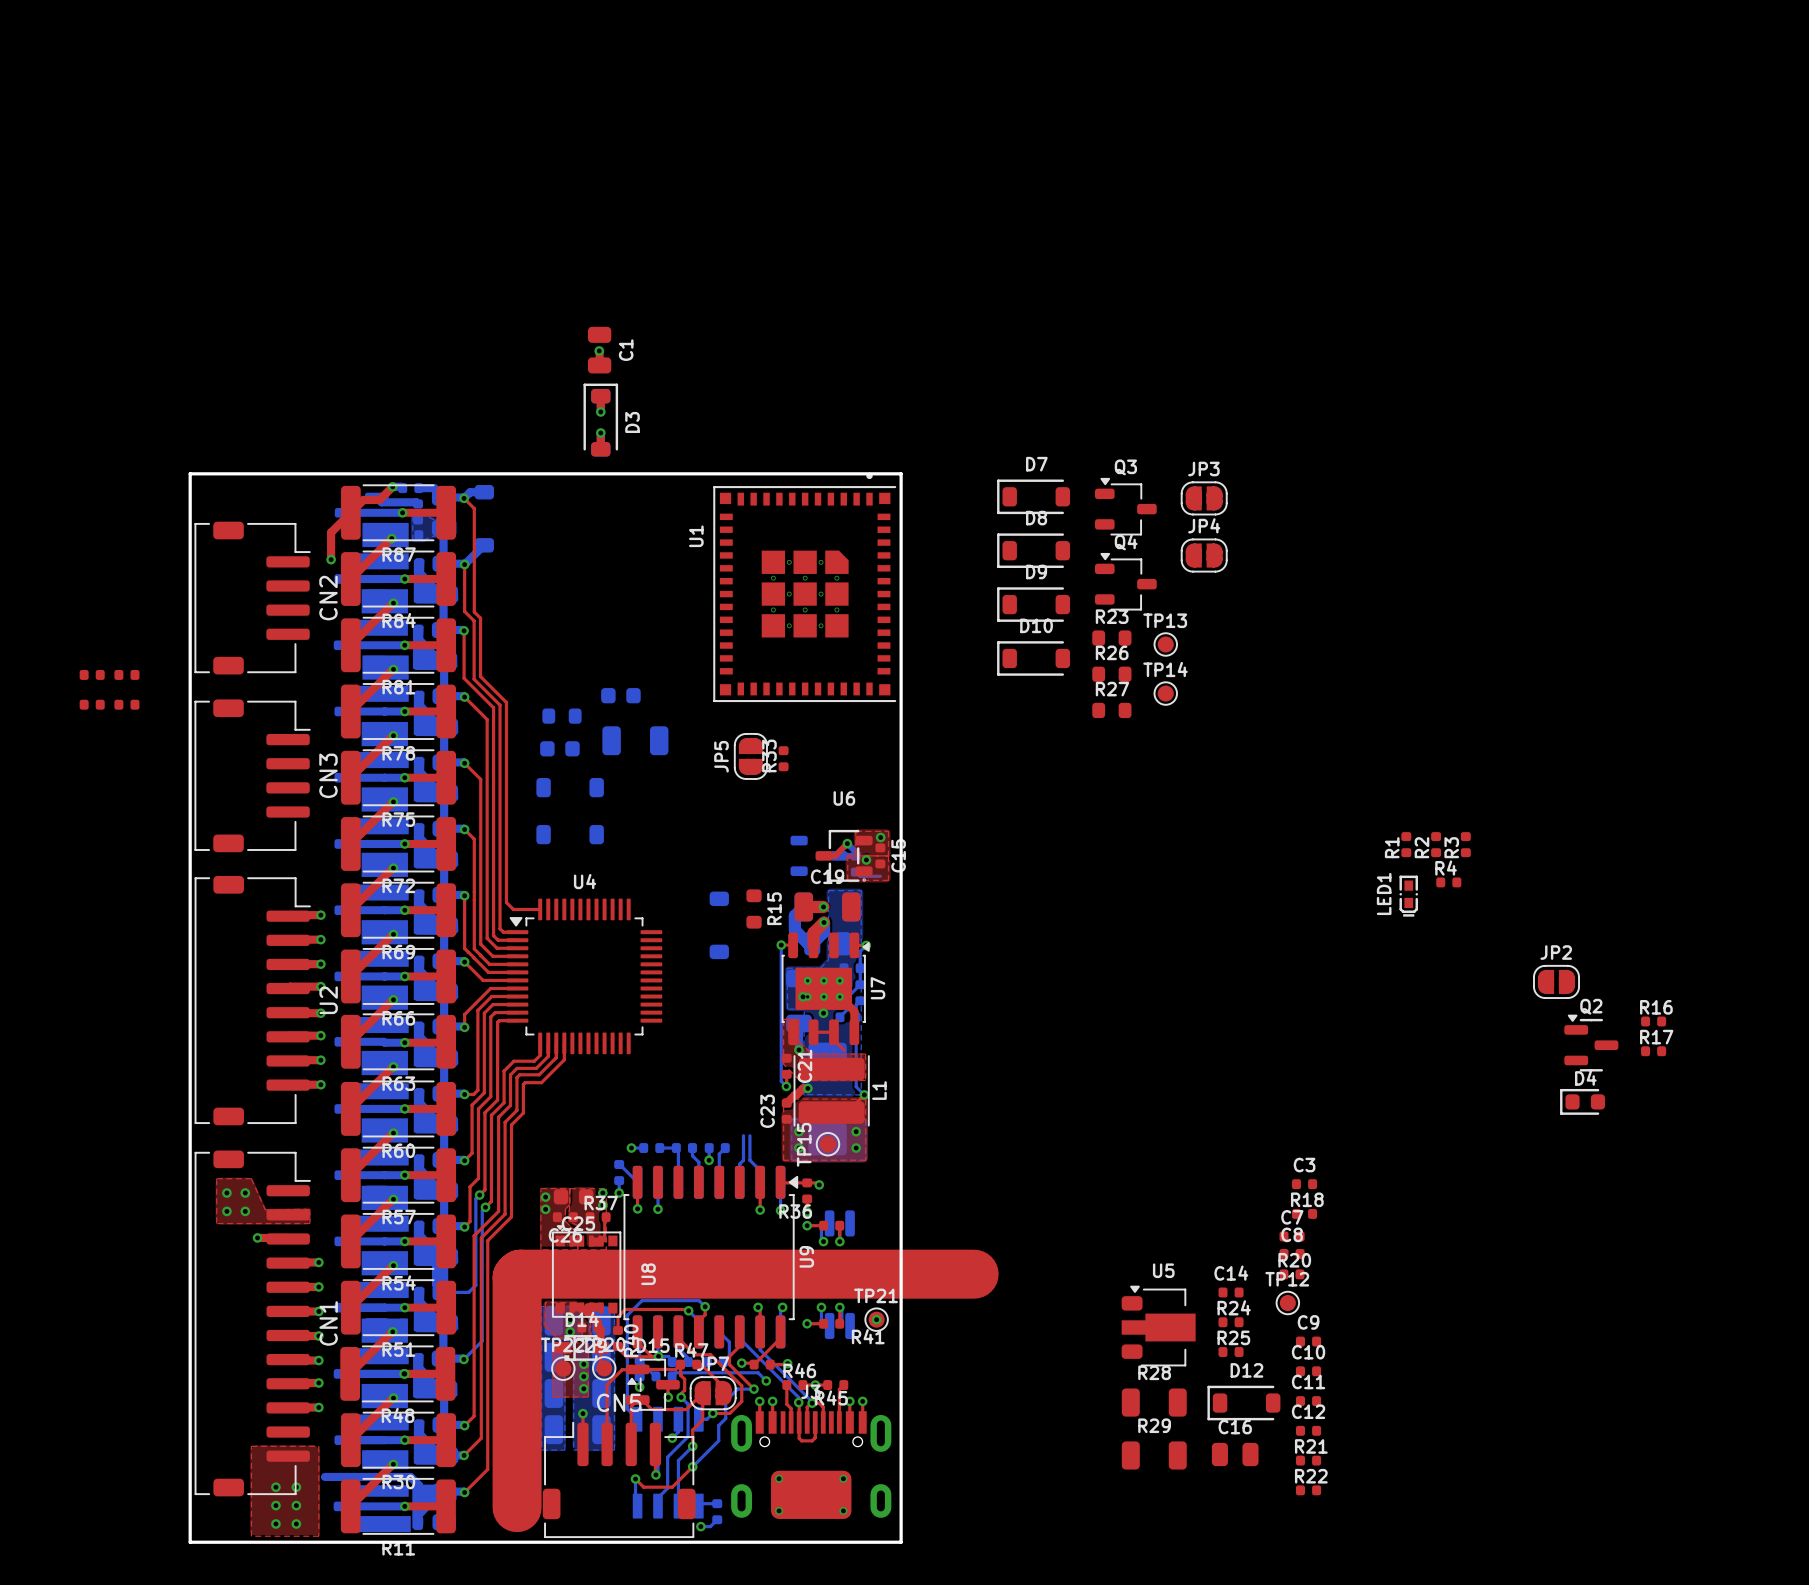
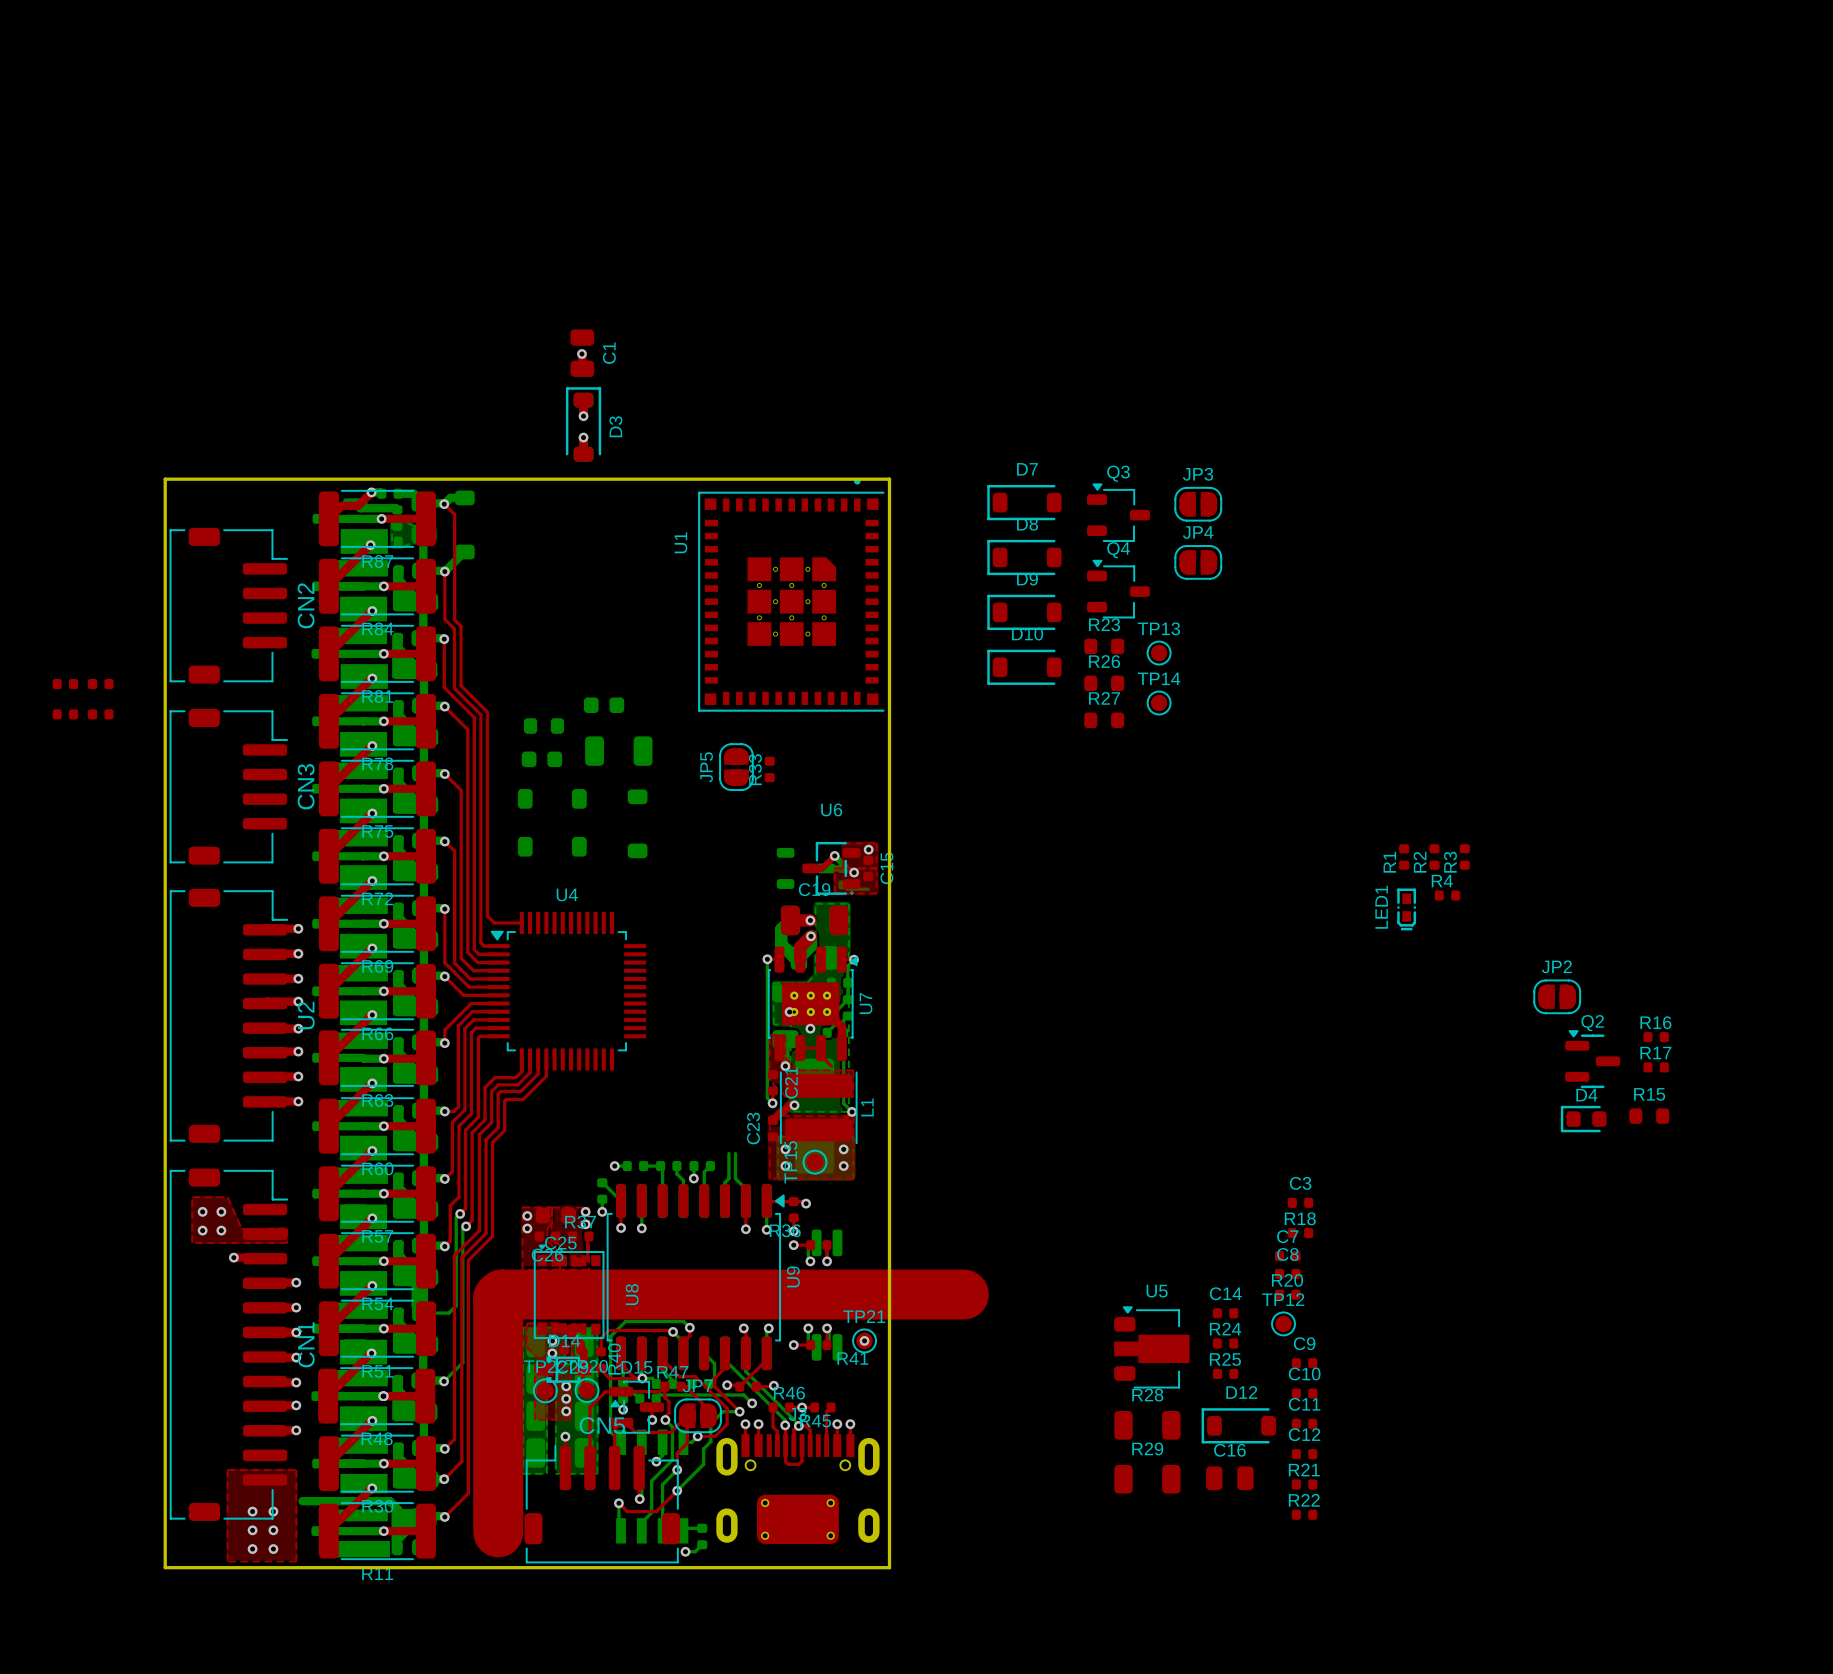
top track: (350, 512) (331, 532) (331, 559) -> none
via: (331, 559) -> none
R15 rotation: 0° (754, 909) -> 90° clockwise (1649, 1116)
R15 position: (754, 909) -> (1649, 1116)
part position: (719, 925) -> (637, 823)

